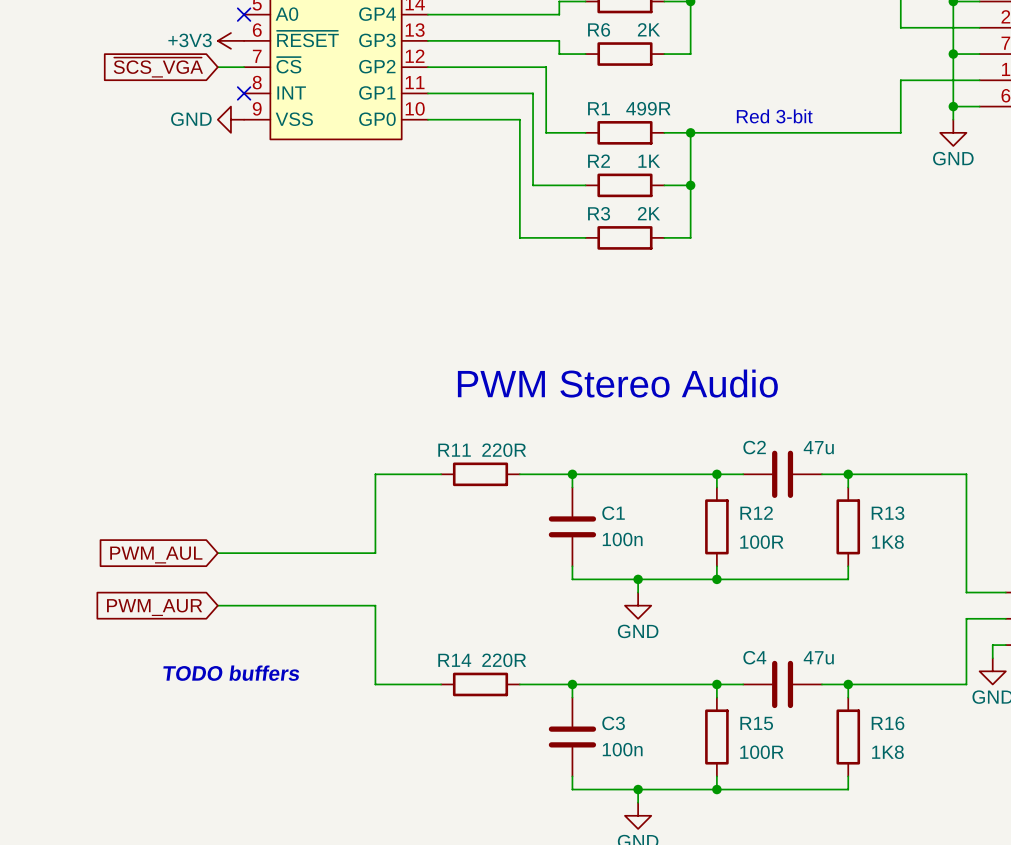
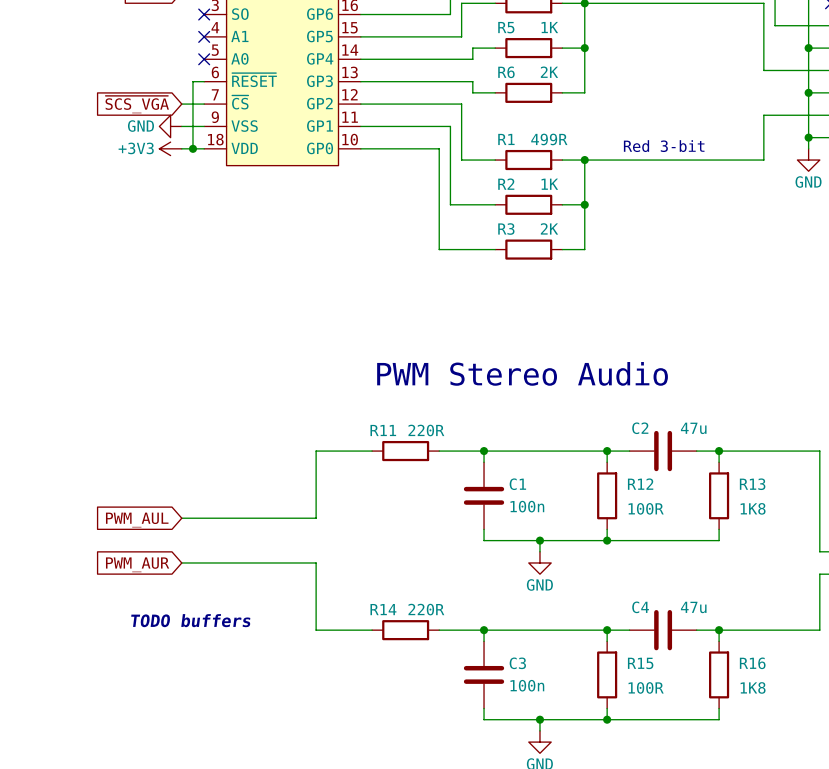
power symbol position: +3V3 (230, 40) -> +3V3 (170, 148)
wire: none -> (204, 81) (192, 81) (192, 148)
part pin number: 8 (257, 82) -> 9 (215, 117)
part pin name: INT (291, 92) -> VSS (244, 126)
wire: none -> (181, 126) (204, 126)
no-connect mark: (244, 93) -> none
part pin number: 9 (257, 108) -> 18 (215, 139)
power symbol position: GND (230, 119) -> GND (170, 126)
junction: none -> (192, 148)
part pin name: VSS (294, 119) -> VDD (244, 148)

